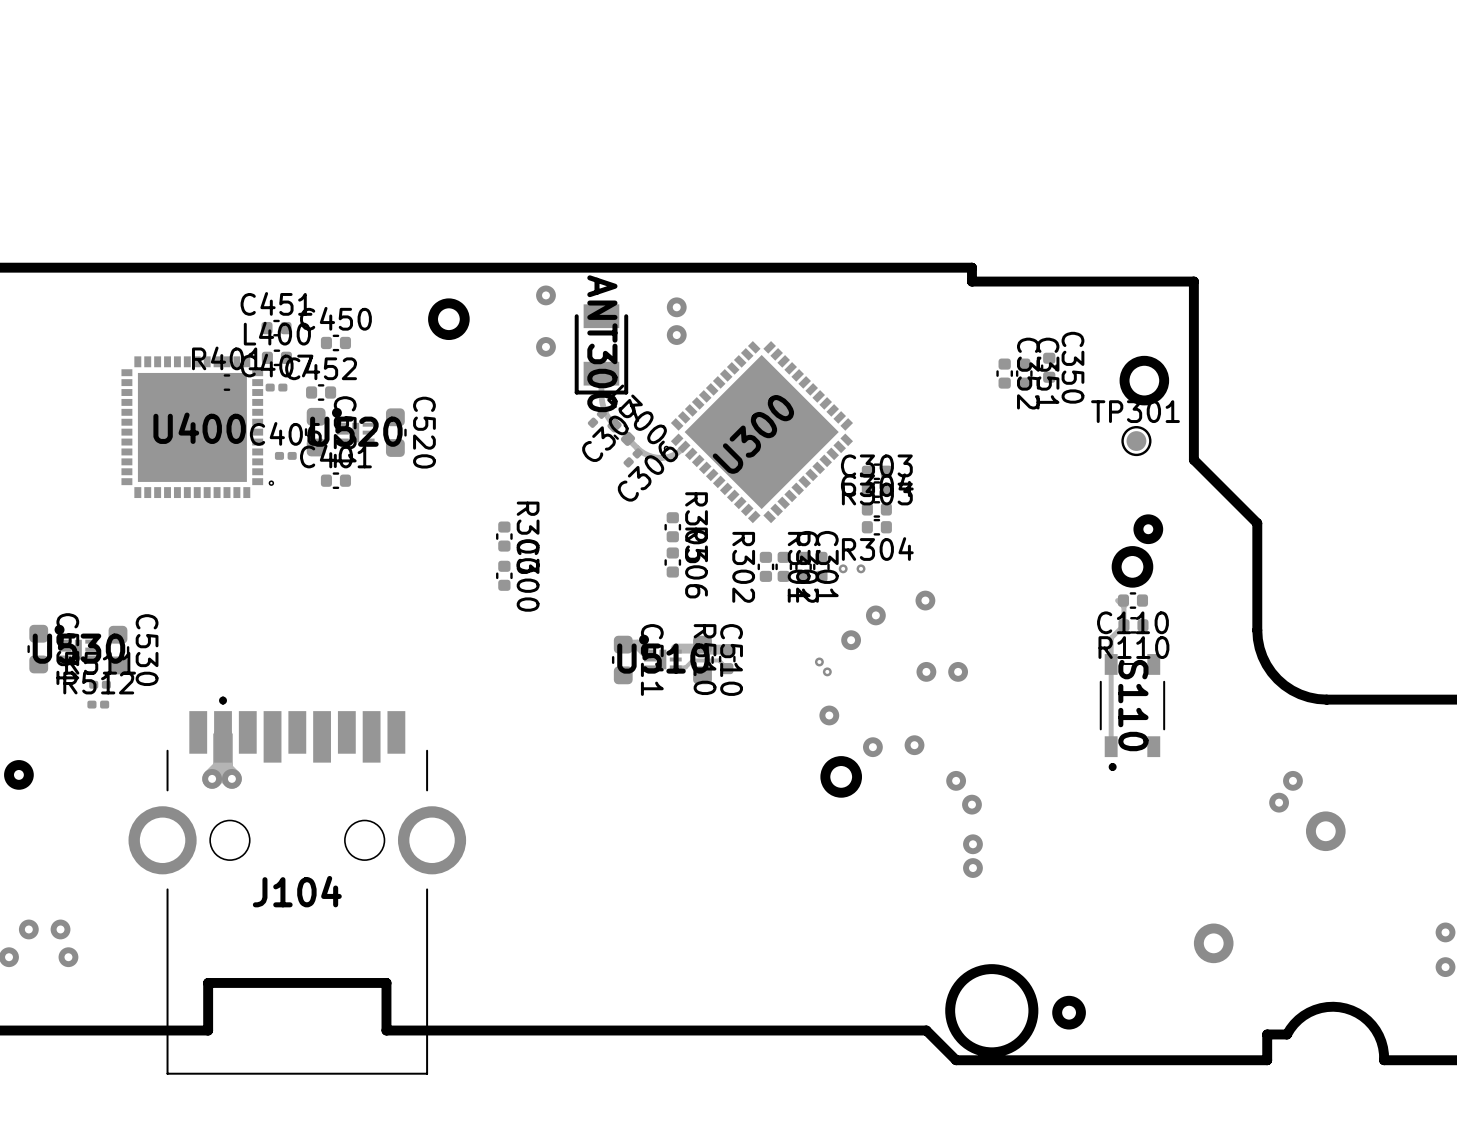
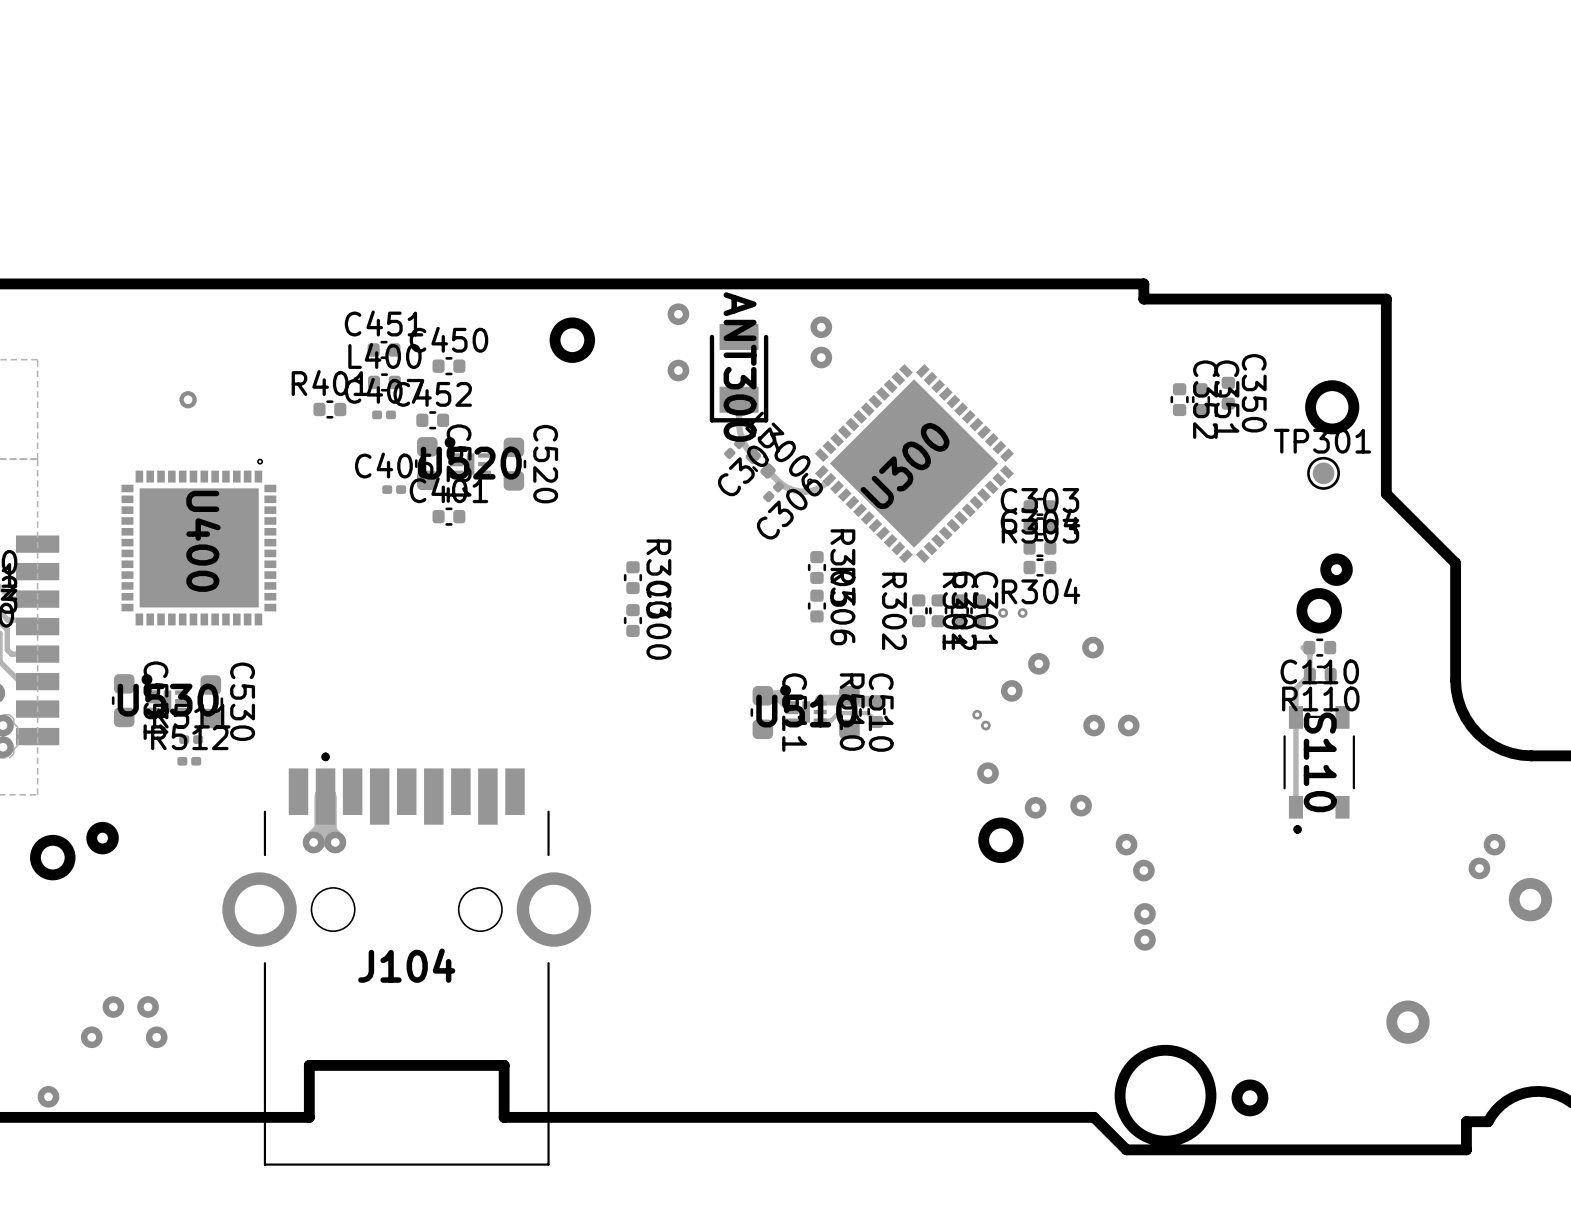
via: none -> (188, 399)
U400 rotation: 0° (197, 427) -> 90° counterclockwise (198, 542)
U400 position: (197, 427) -> (198, 542)

